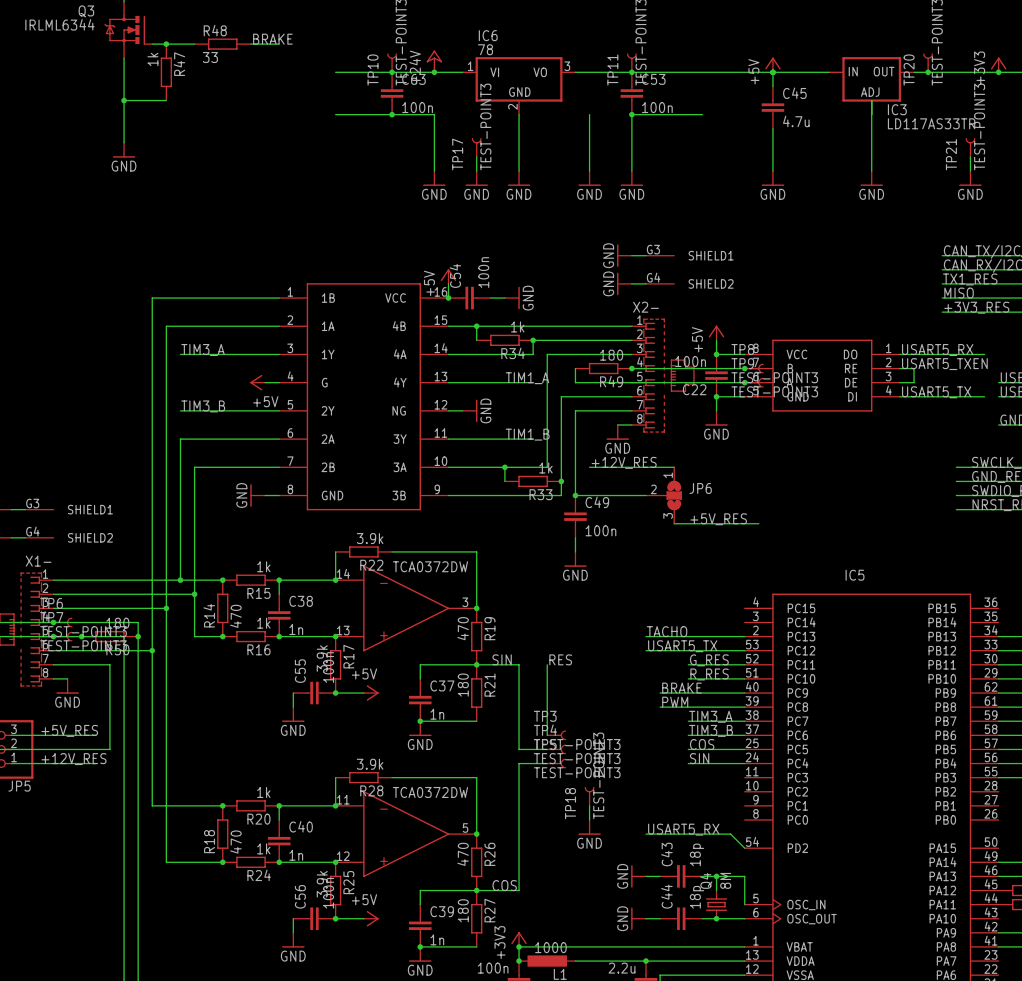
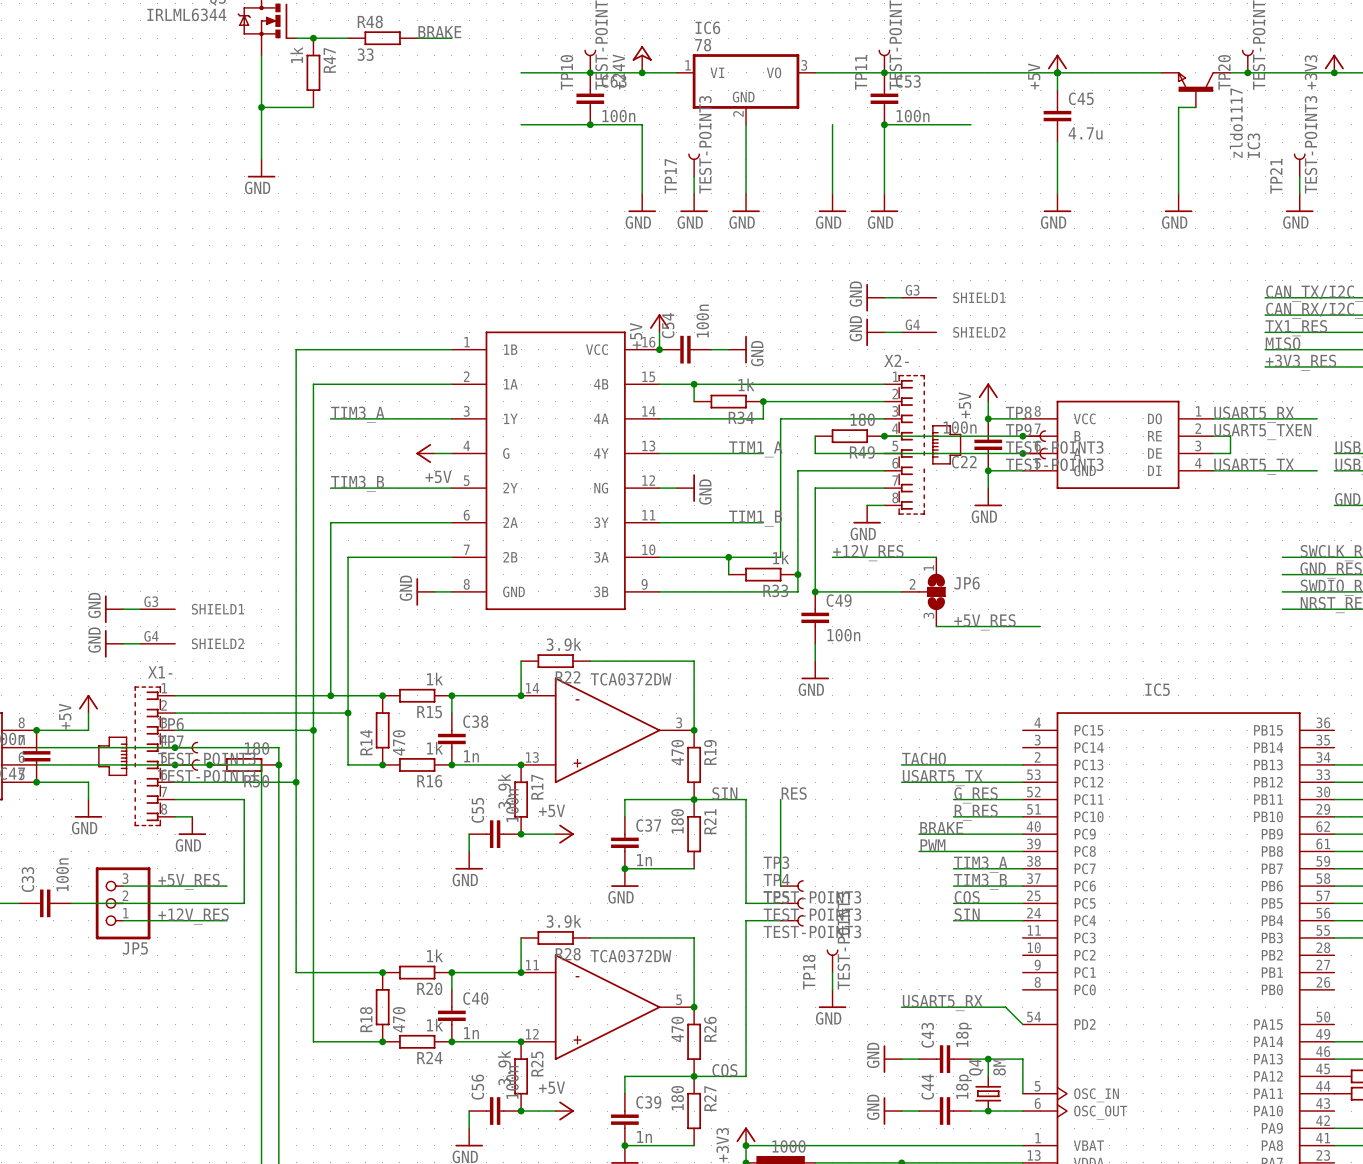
IC3 symbol: [829, 57, 915, 115] -> [1161, 72, 1231, 108]
IC3 name position: IC3 (897, 109) -> IC3 (1253, 145)
IC3 value: LD117AS33TR (931, 123) -> zldo1117 (1236, 123)

